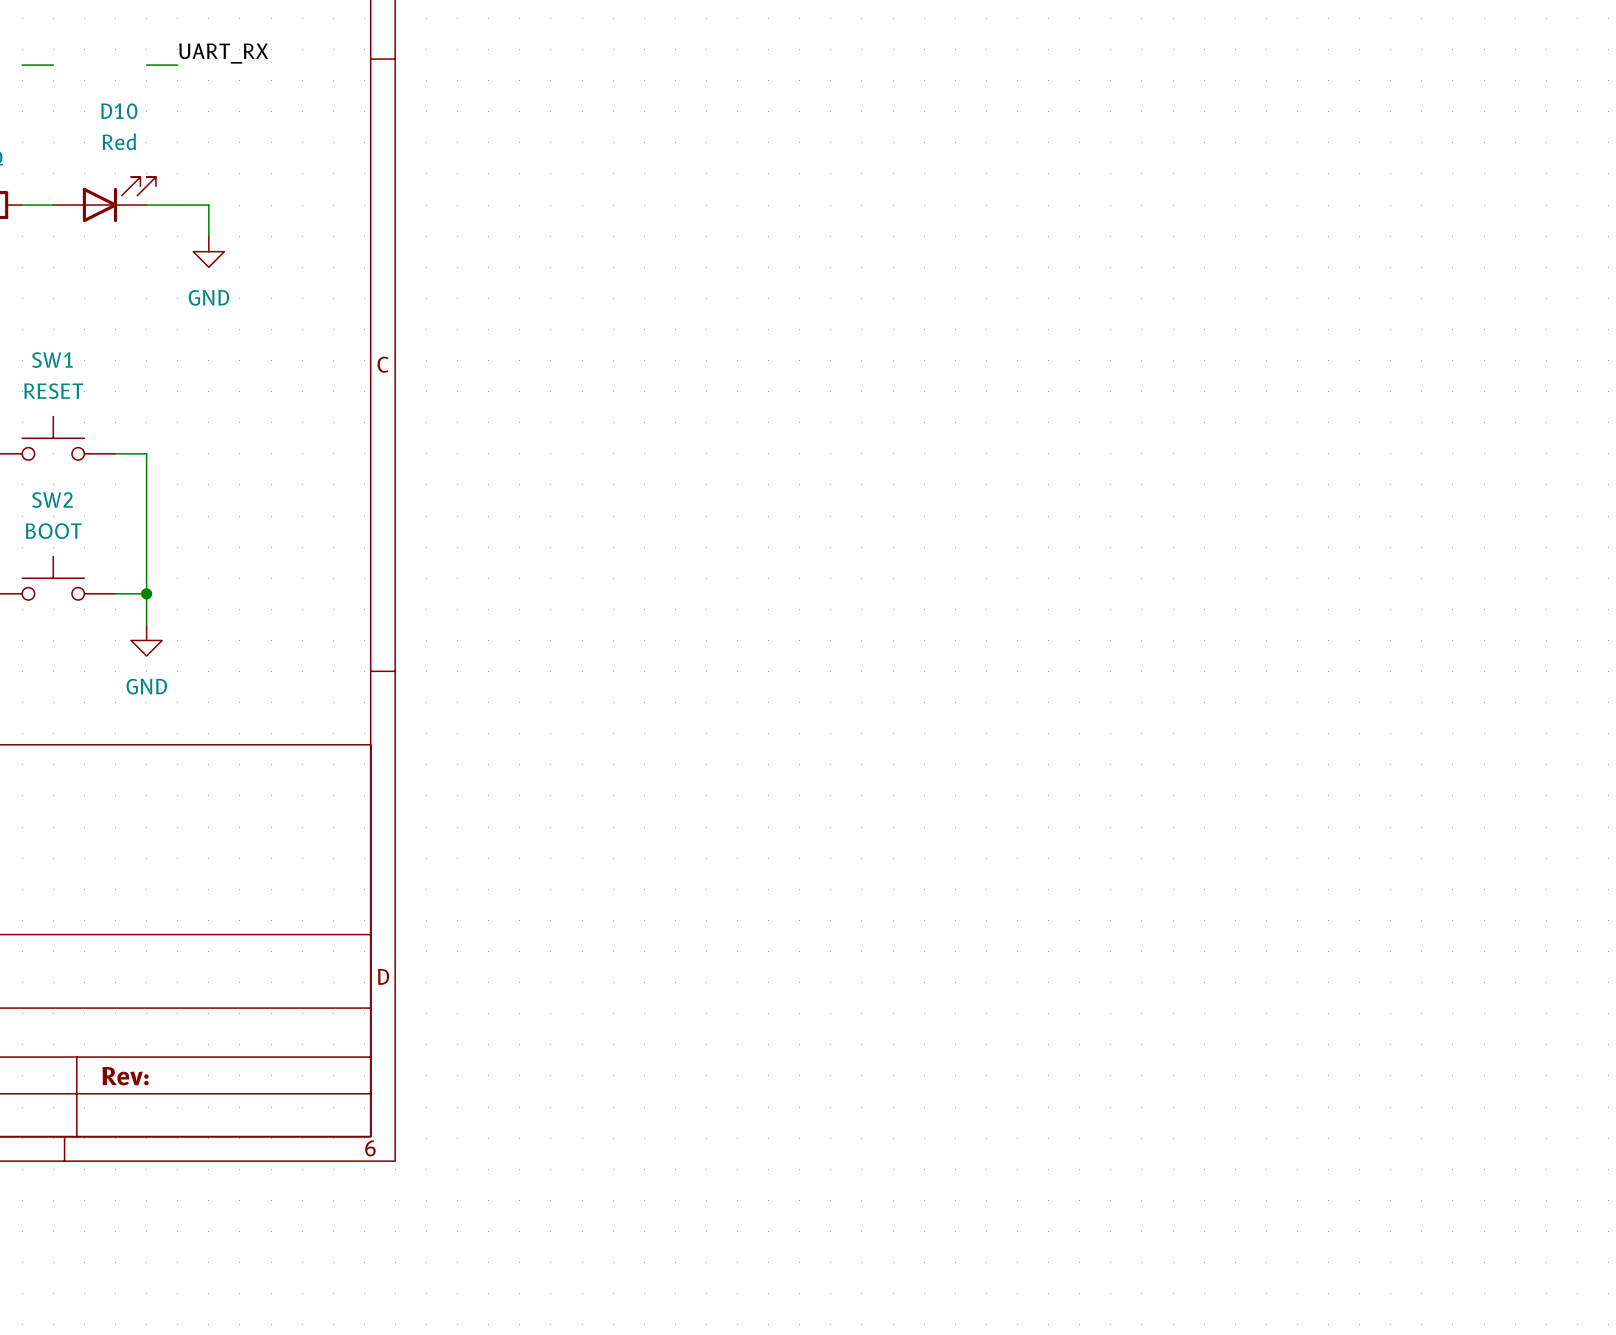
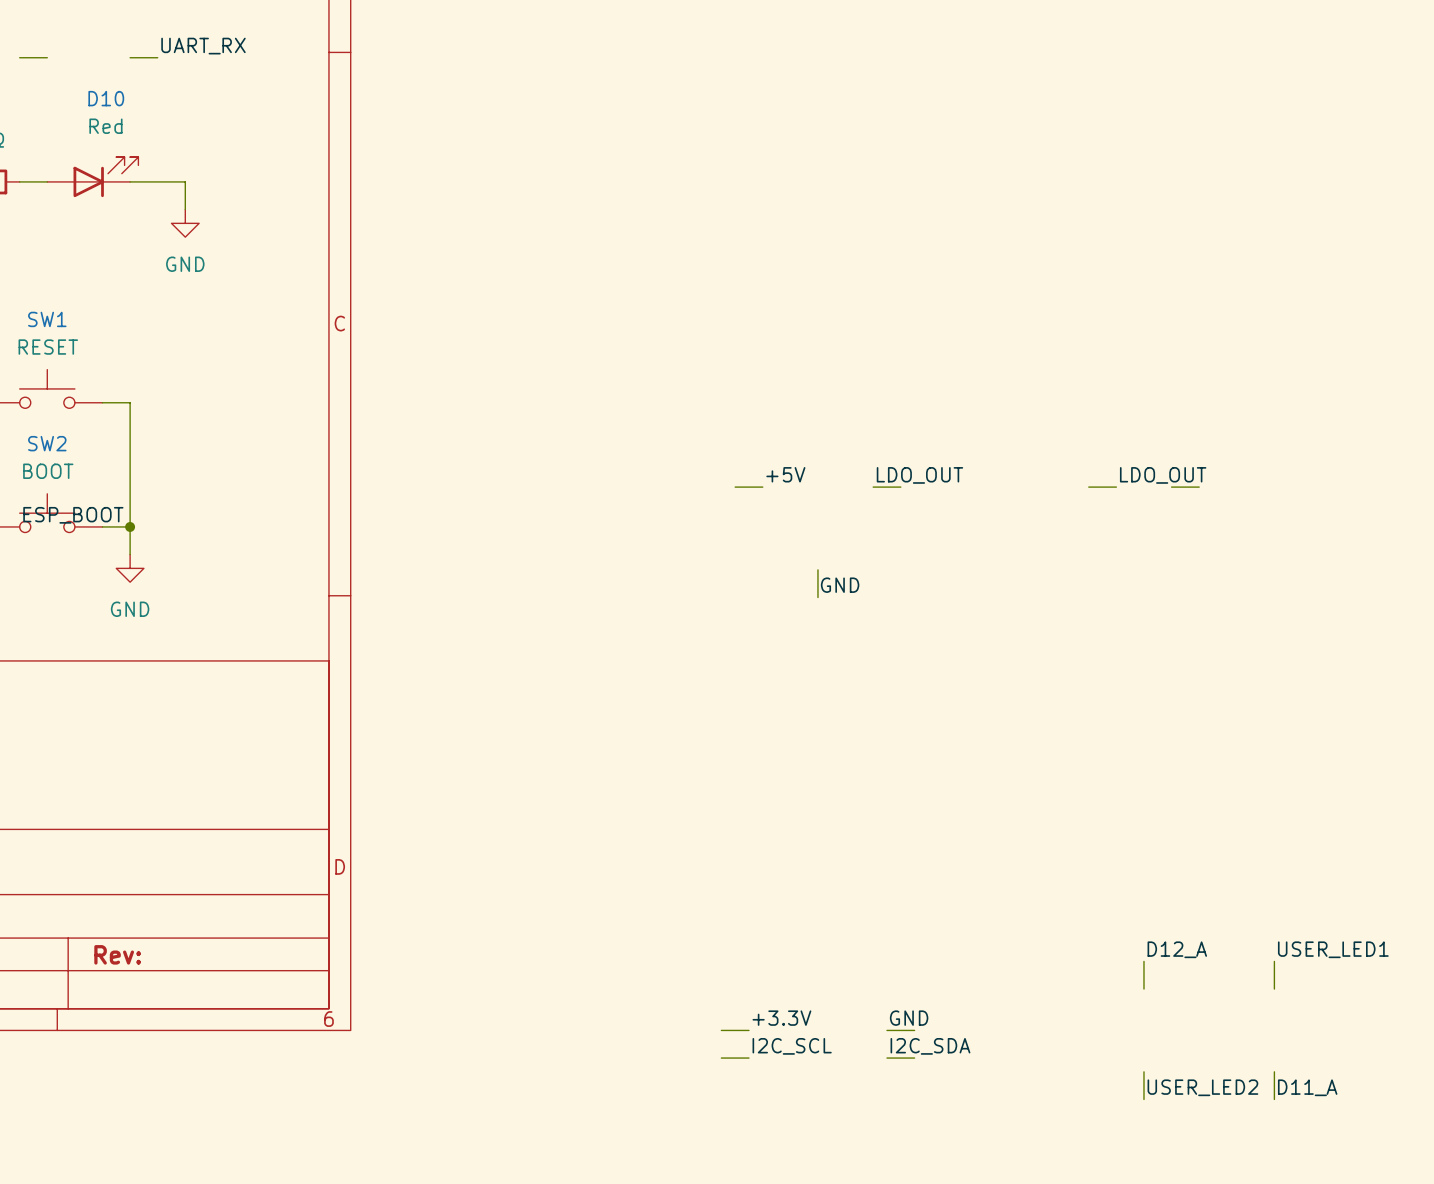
label: none -> +5V (785, 474)
label: none -> LDO_OUT (919, 475)
label: none -> LDO_OUT (1163, 475)
wire: none -> (735, 487) (762, 487)
wire: none -> (873, 487) (900, 487)
wire: none -> (1088, 487) (1116, 487)
wire: none -> (1171, 487) (1199, 487)
label: none -> ESP_BOOT (73, 515)
wire: none -> (817, 569) (817, 597)
label: none -> GND (840, 585)
label: none -> D12_A (1177, 949)
label: none -> USER_LED1 (1333, 949)
wire: none -> (1143, 961) (1143, 989)
wire: none -> (1274, 961) (1274, 989)
label: none -> +3.3V (781, 1018)
label: none -> GND (909, 1018)
wire: none -> (721, 1030) (748, 1030)
wire: none -> (886, 1030) (914, 1030)
label: none -> I2C_SCL (792, 1046)
label: none -> I2C_SDA (930, 1046)
wire: none -> (721, 1058) (748, 1058)
wire: none -> (886, 1058) (914, 1058)
wire: none -> (1143, 1071) (1143, 1099)
wire: none -> (1274, 1071) (1274, 1099)
label: none -> USER_LED2 (1202, 1087)
label: none -> D11_A (1307, 1087)

